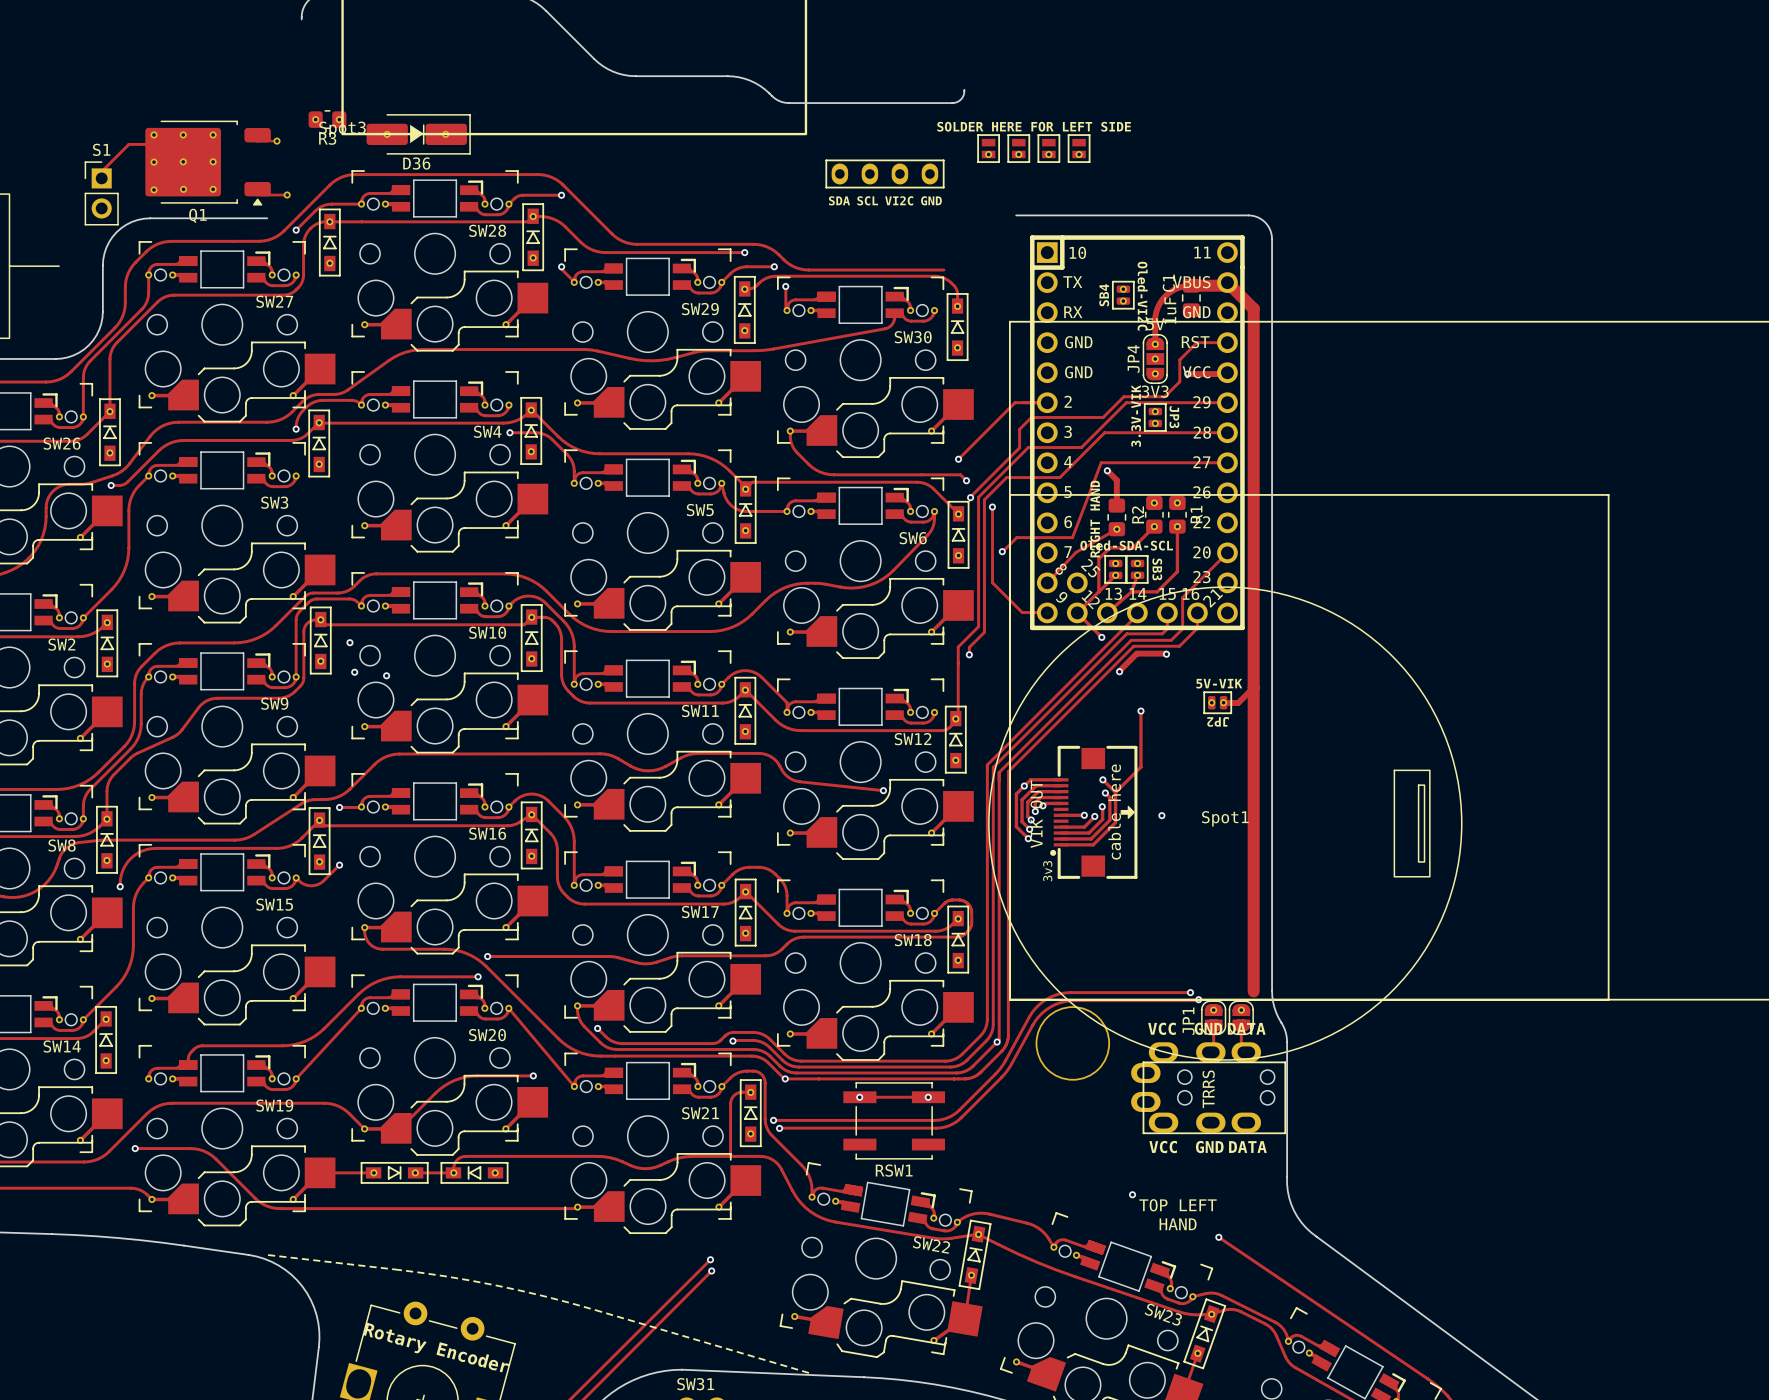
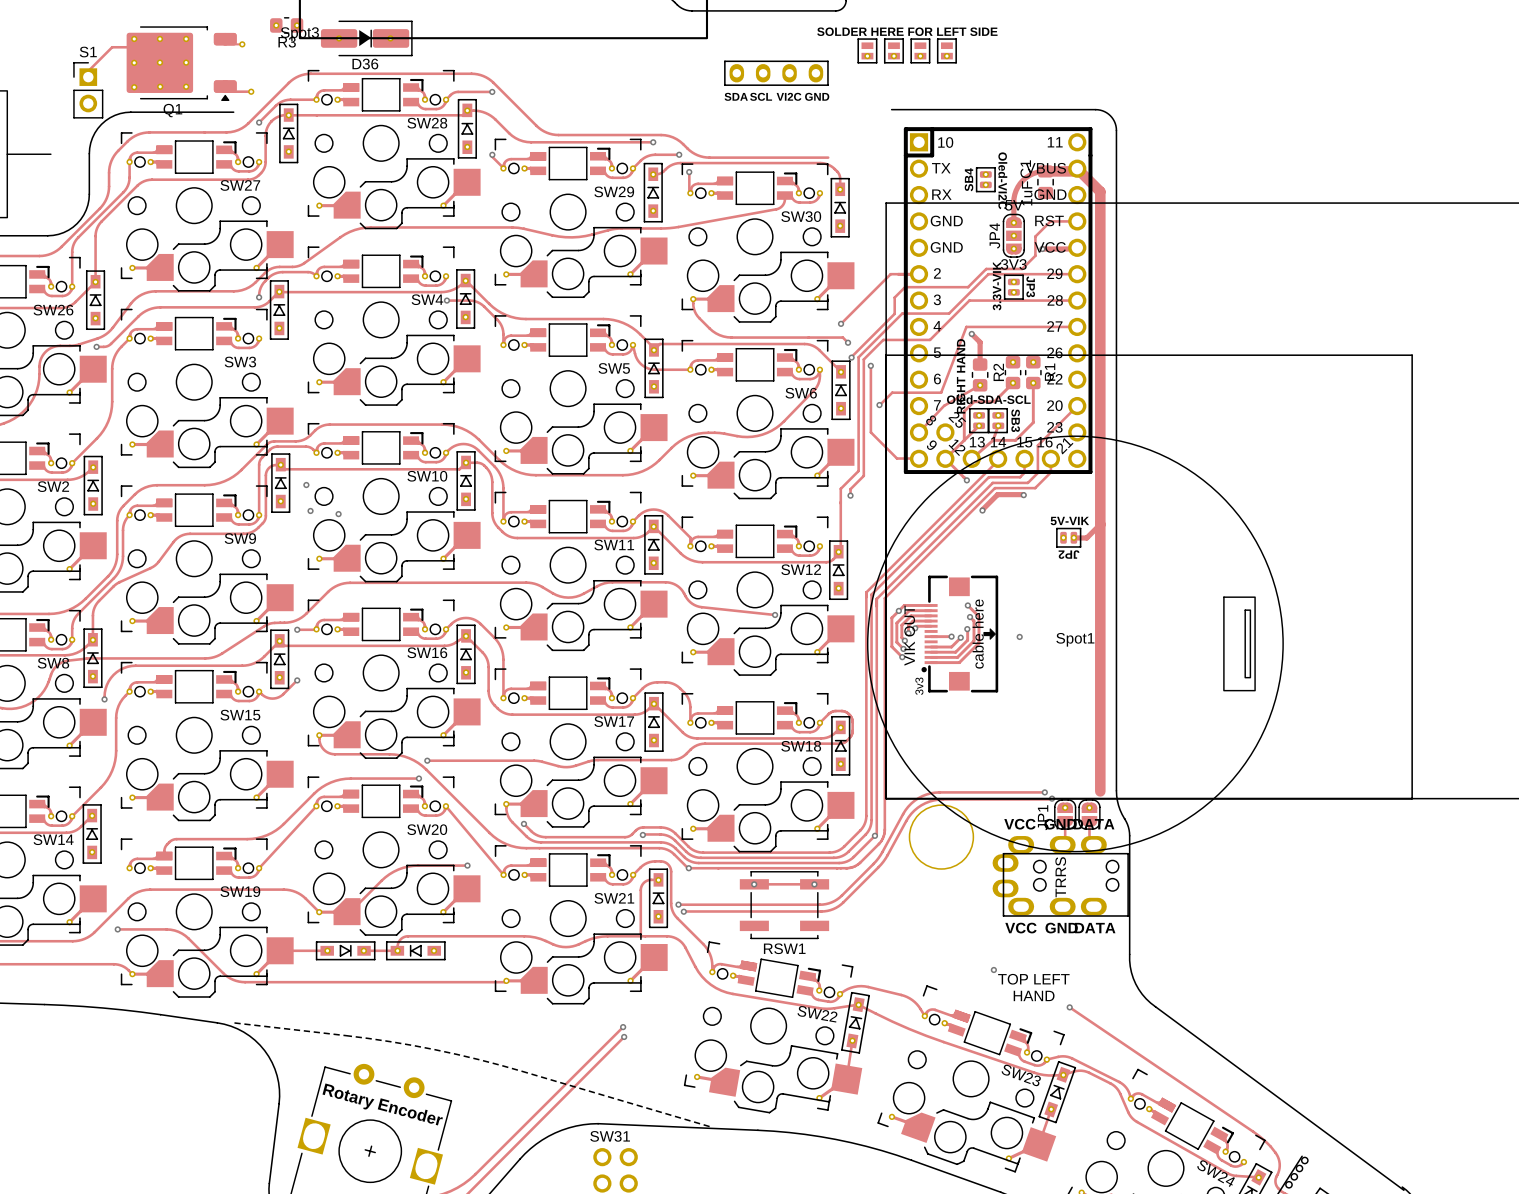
track: (1140, 711) (1140, 767) (1115, 792) -> none
via: (1140, 711) -> none

